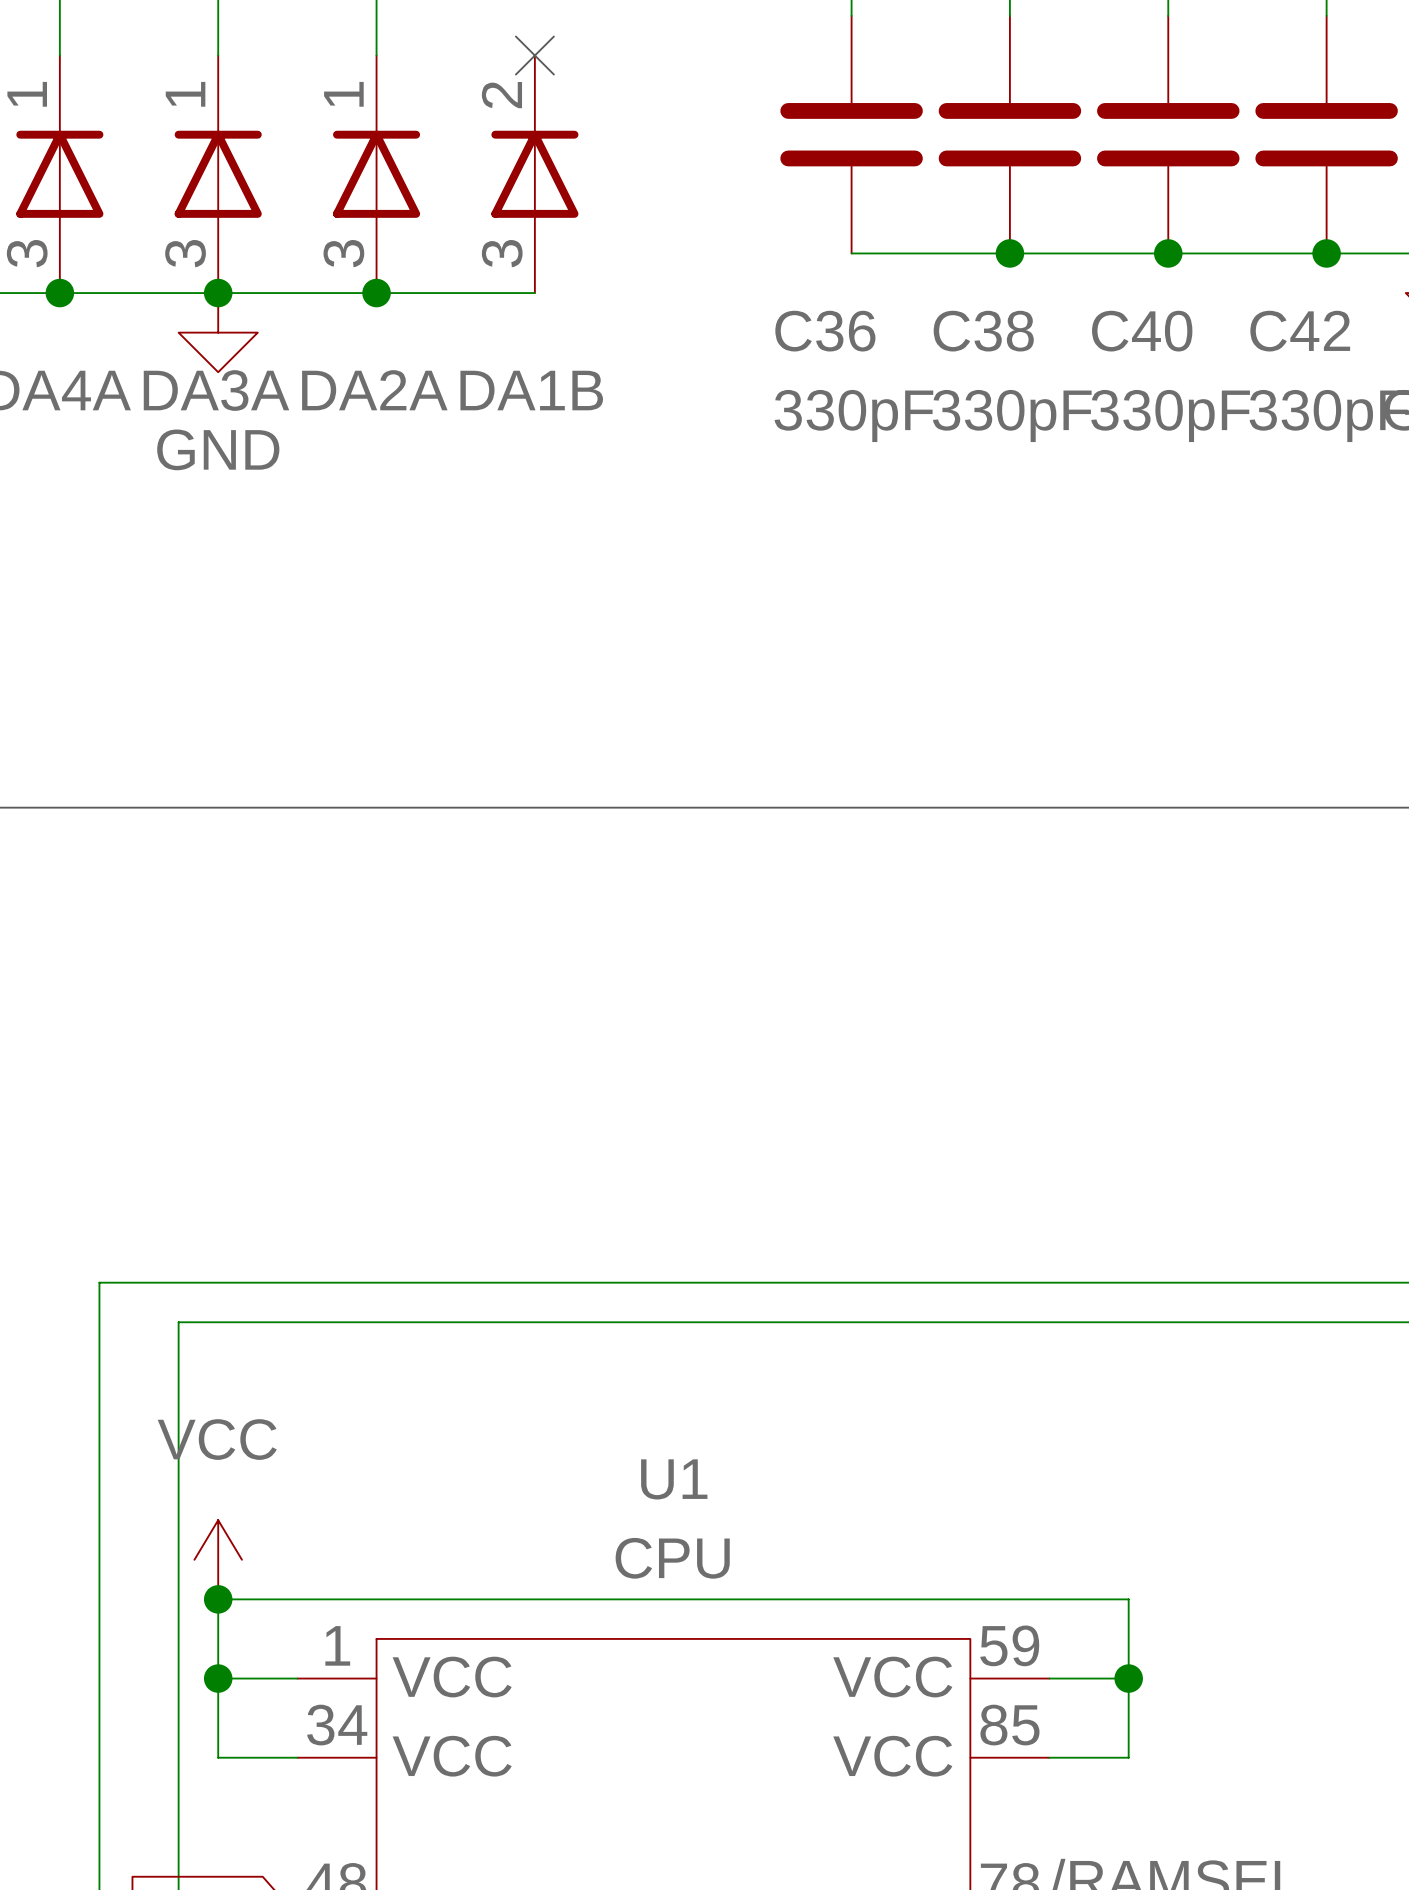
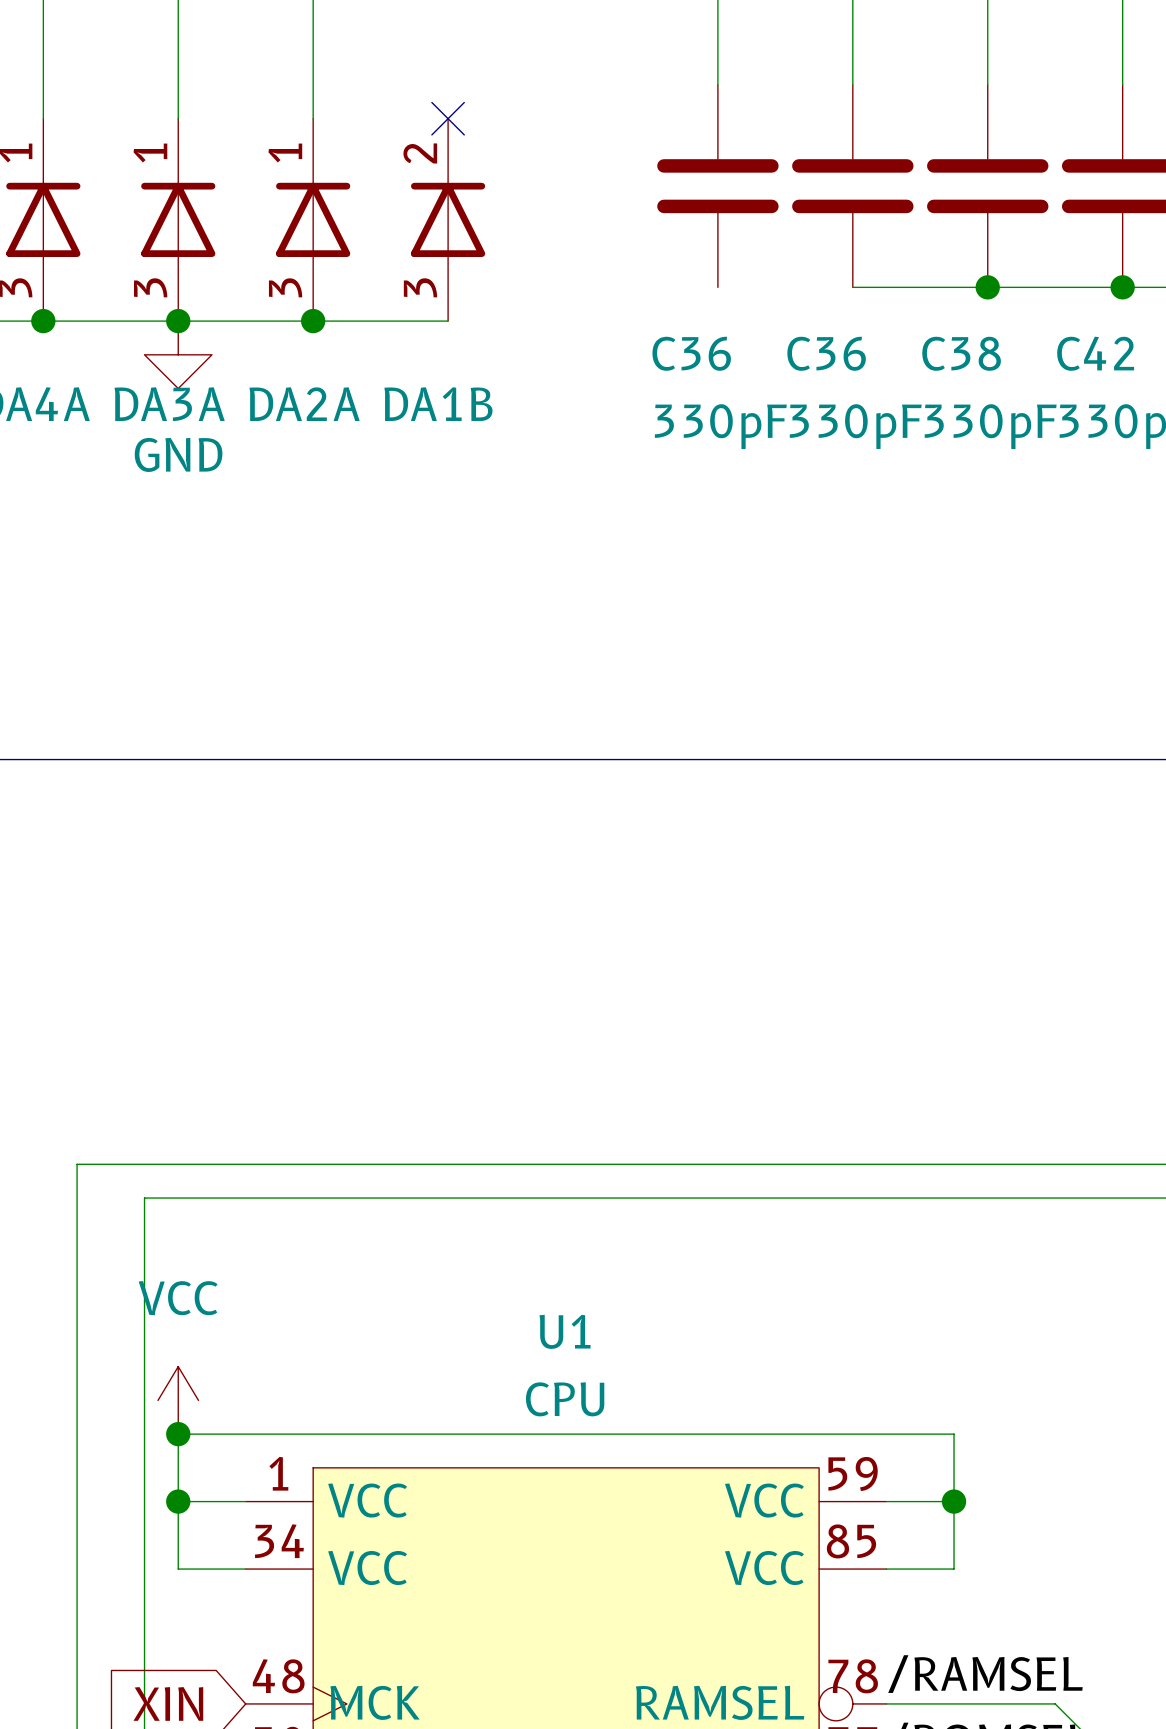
wire: (851, 253) (1009, 253) -> none
junction: (1009, 253) -> none
C38 name: C38 (983, 331) -> C36 (826, 353)
C40 name: C40 (1142, 331) -> C38 (961, 353)

